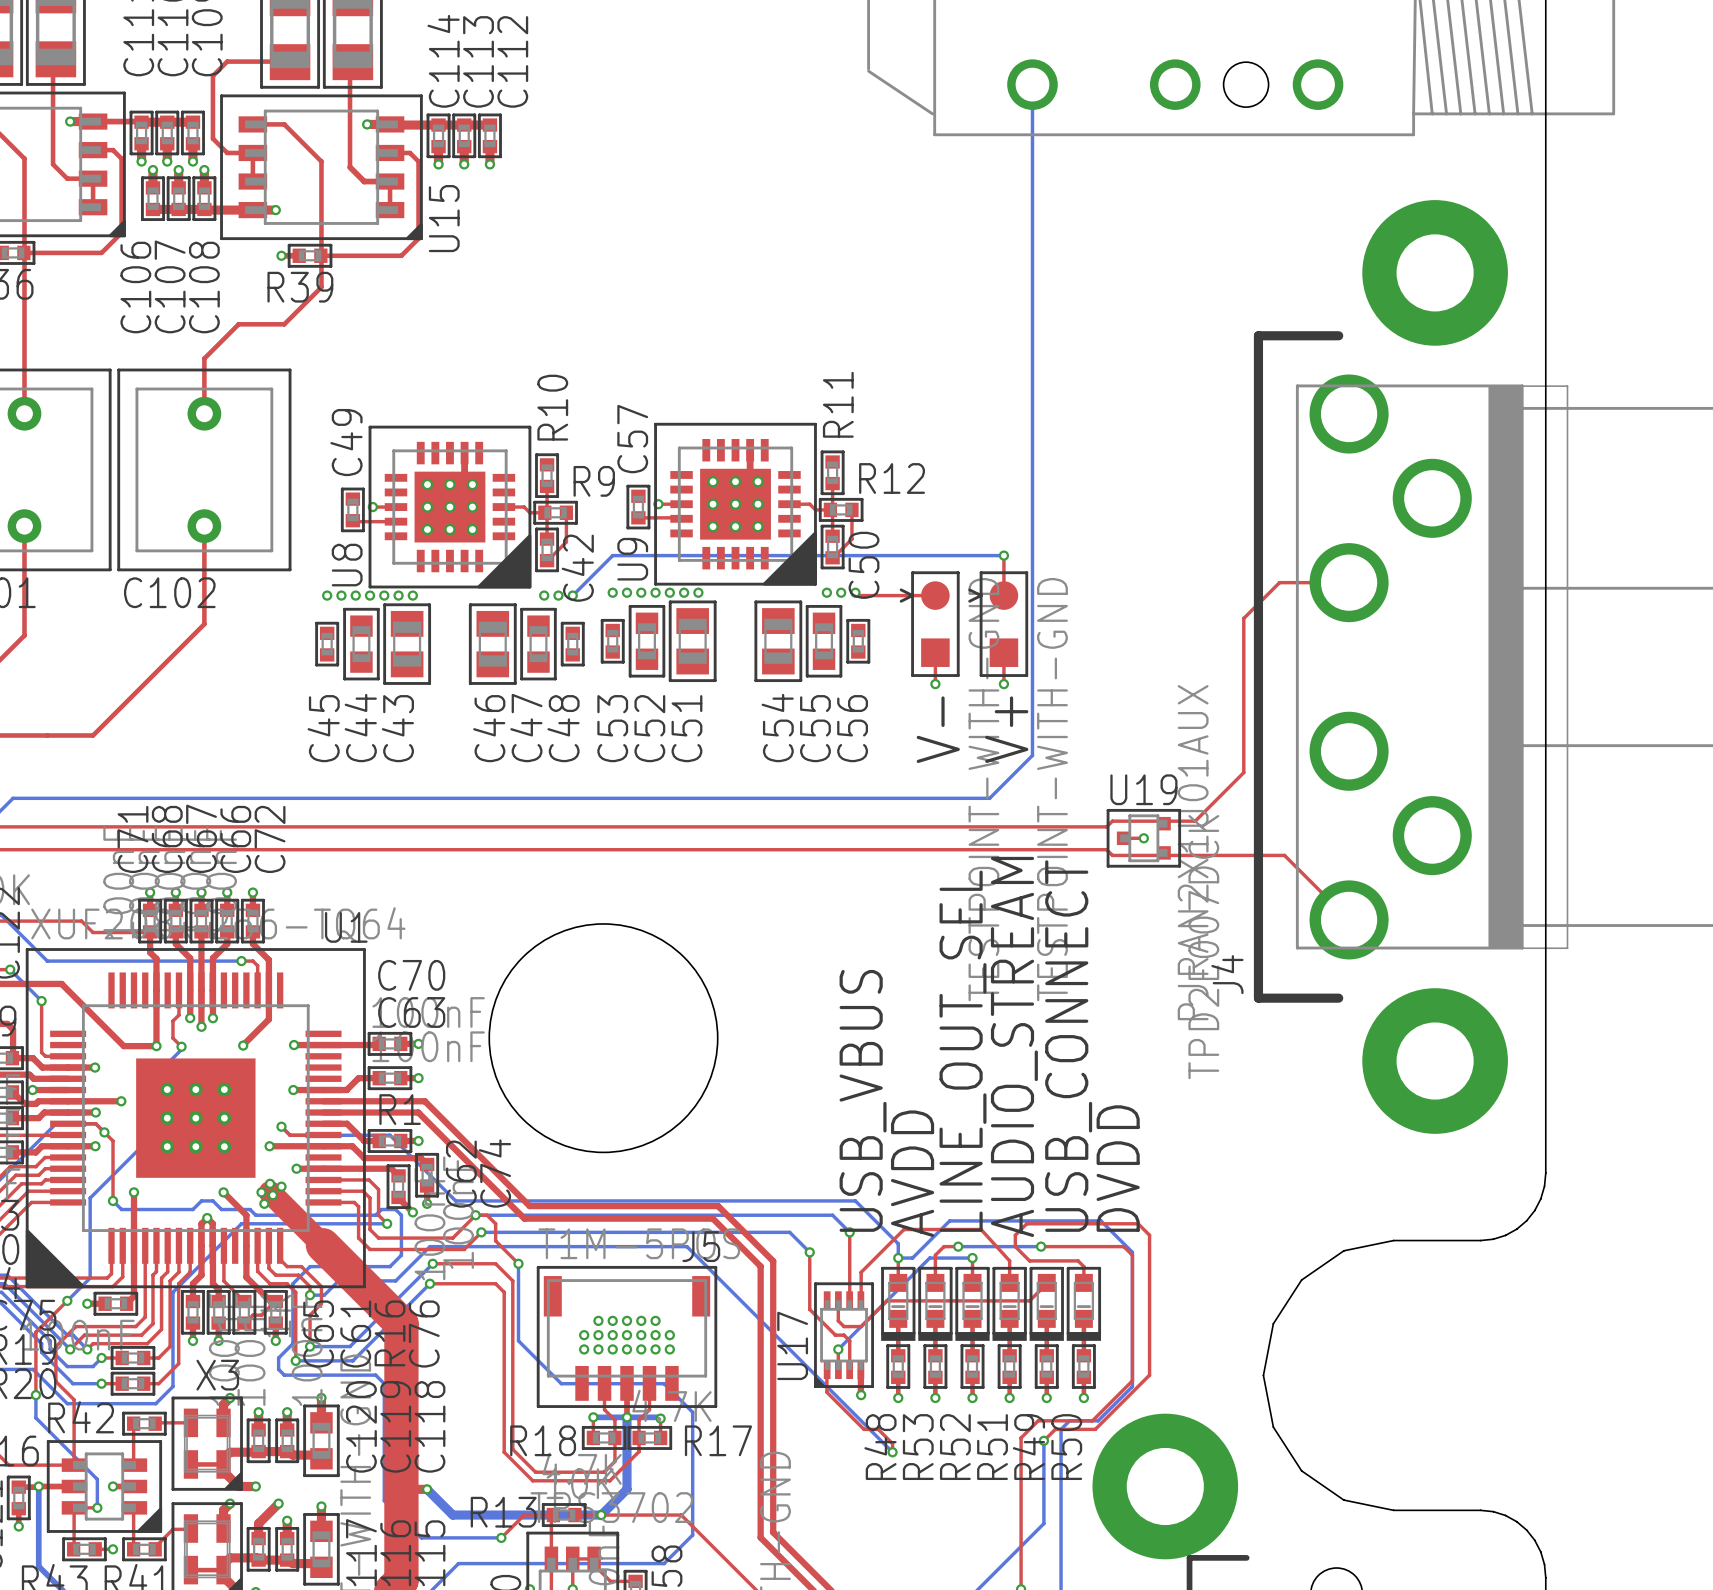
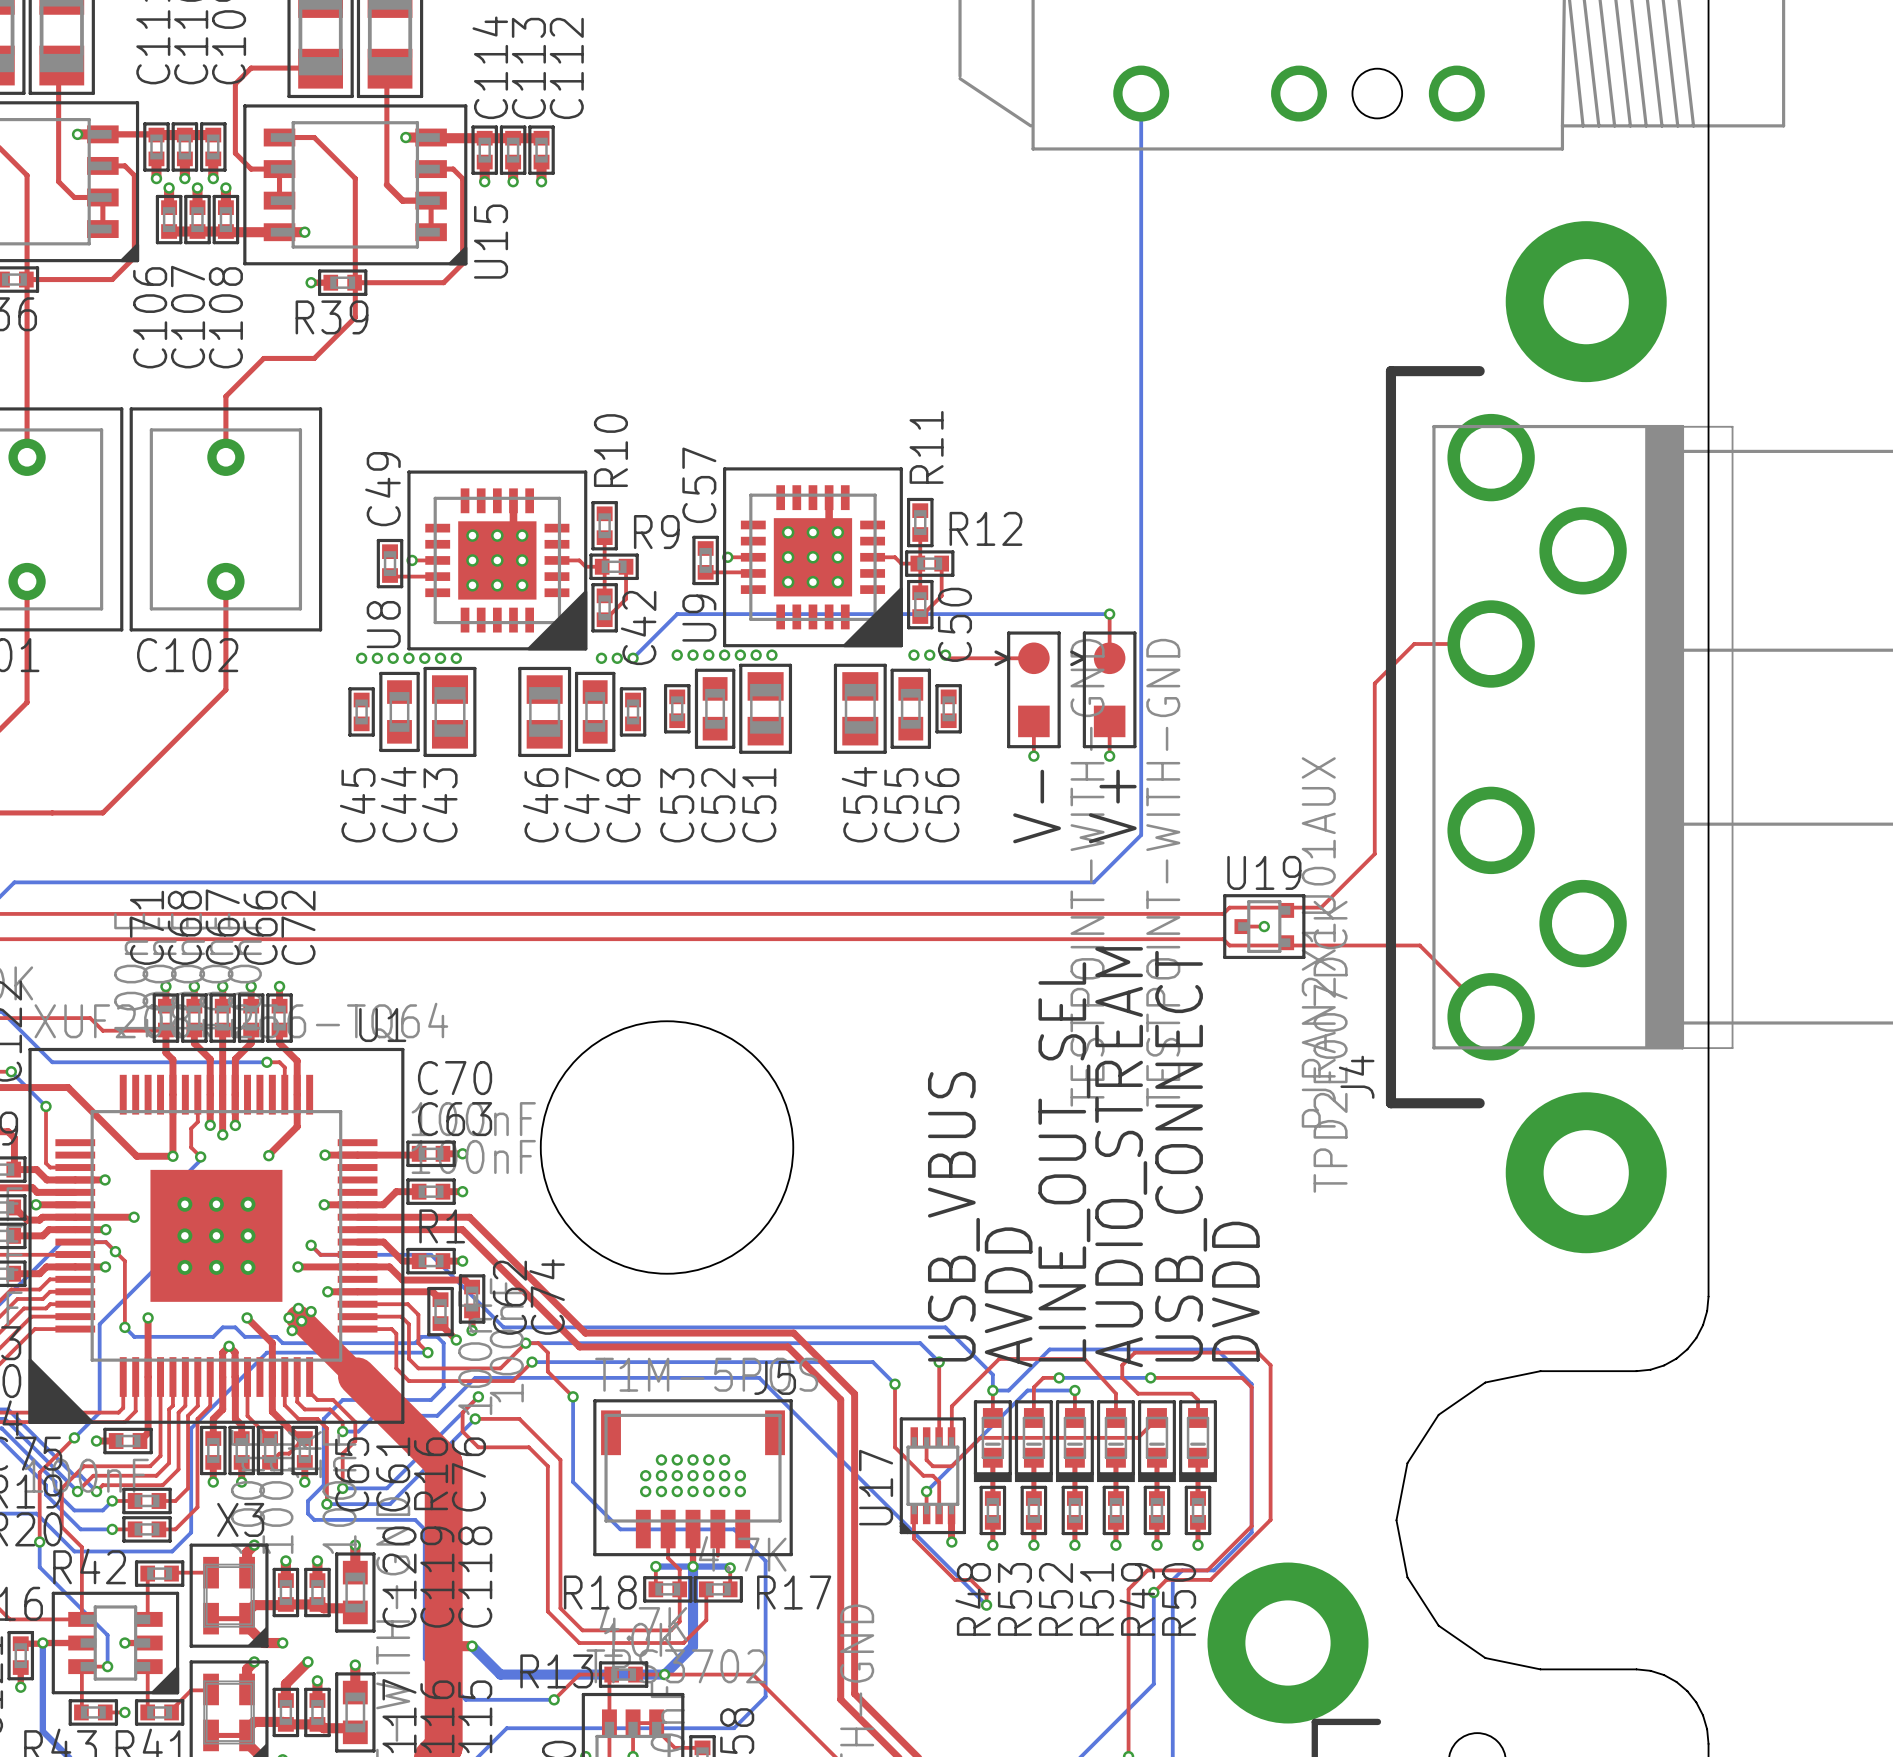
top track: (432, 1263) (495, 1263) (512, 1280) (512, 1449) (535, 1472) (604, 1472) (614, 1461) -> (478, 1396) (462, 1412) (462, 1431) (478, 1447) (528, 1447) (547, 1466) (547, 1611) (579, 1643) (683, 1643) (706, 1620) (706, 1604)
top track: (469, 1283) (495, 1283) (504, 1292) (504, 1452) (507, 1455) -> (519, 1418) (560, 1459) (560, 1608)
top track: (649, 1407) (639, 1420) (639, 1437) -> none
top track: (639, 1451) (609, 1480) (532, 1480) (527, 1475) -> (679, 1615) (679, 1621) (670, 1630) (582, 1630)

